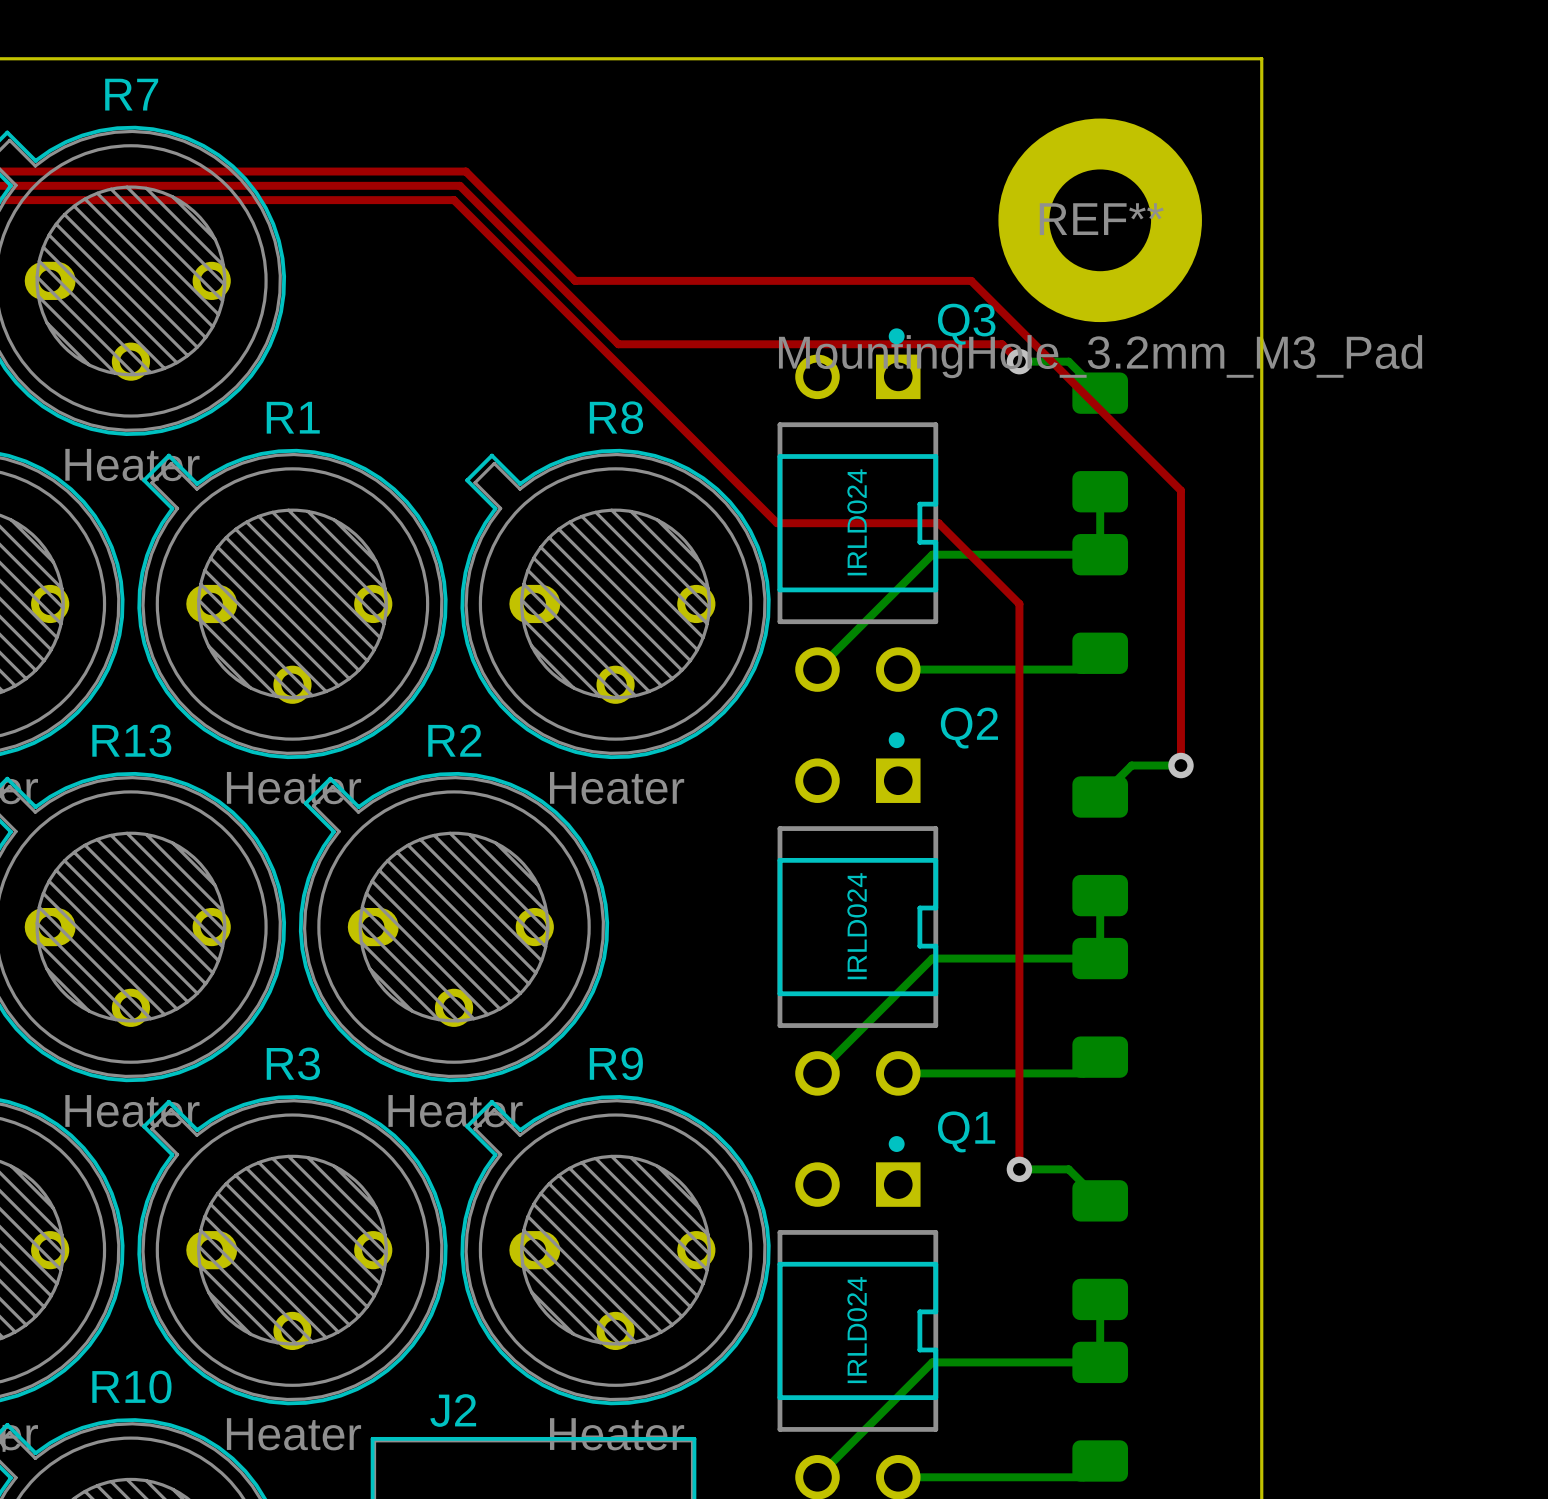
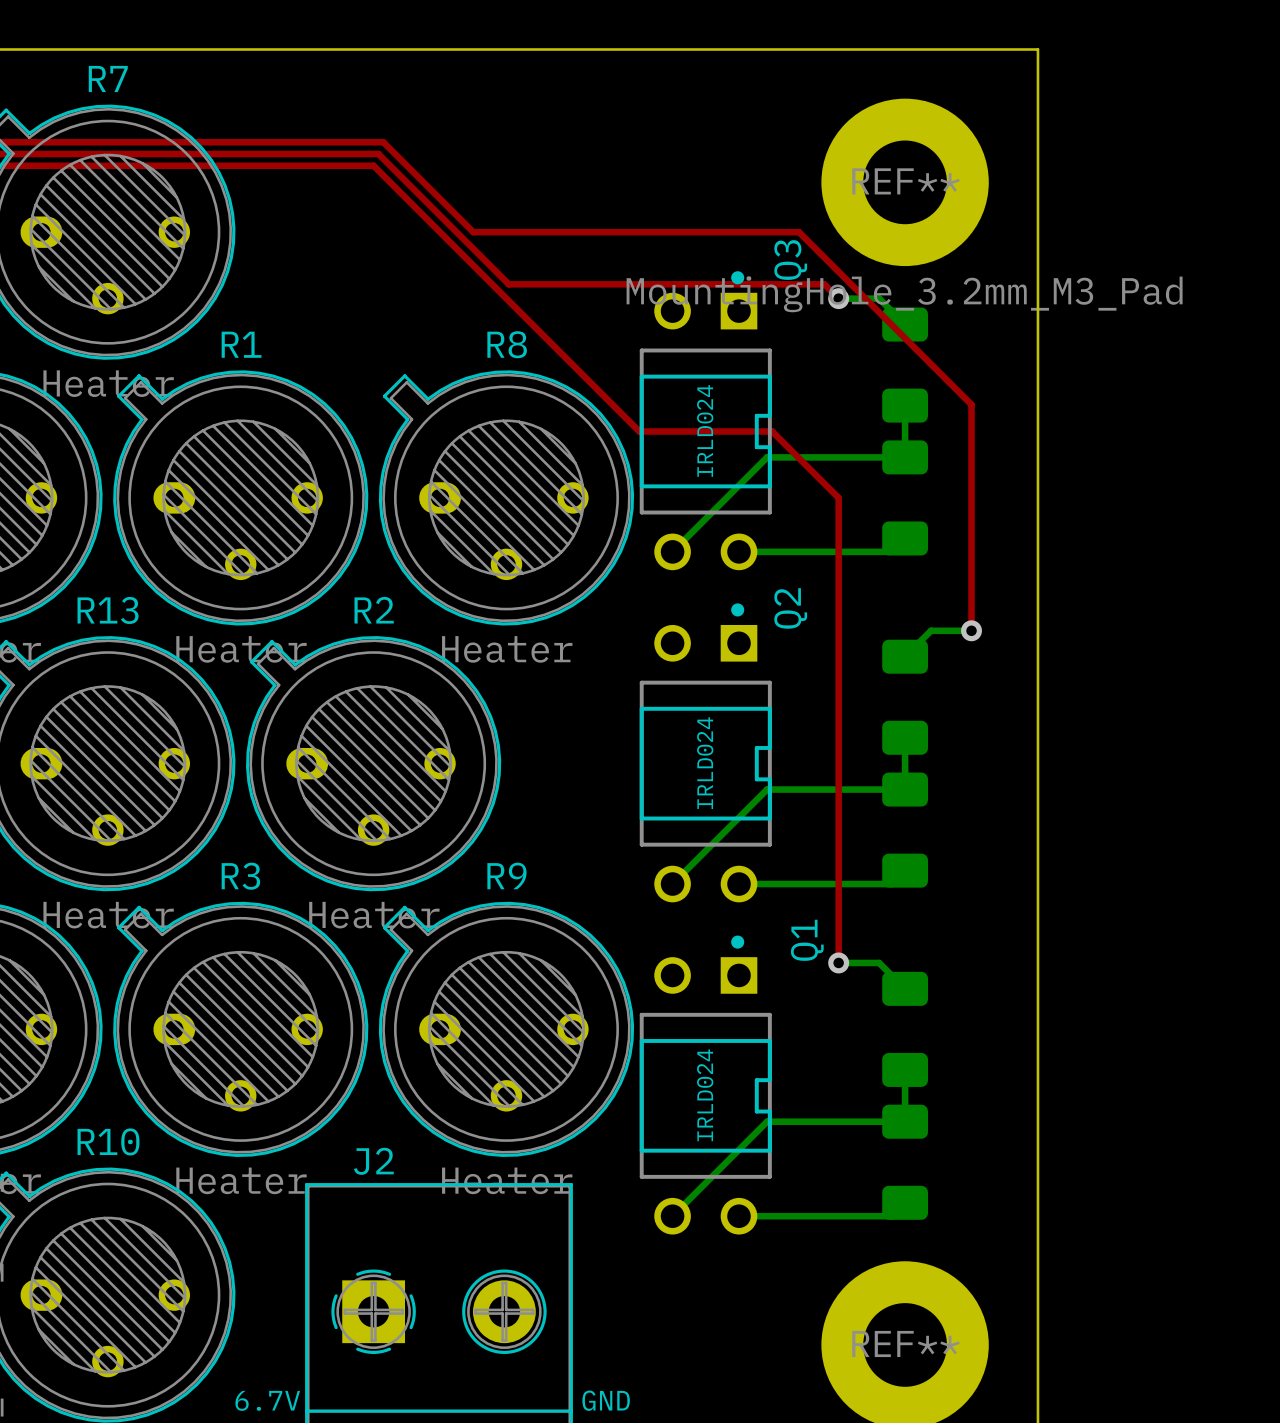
Q3 name rotation: 0° (966, 324) -> 90° counterclockwise (790, 260)
Q2 name rotation: 0° (969, 728) -> 90° counterclockwise (790, 608)
Q1 name rotation: 0° (966, 1131) -> 90° counterclockwise (807, 940)

